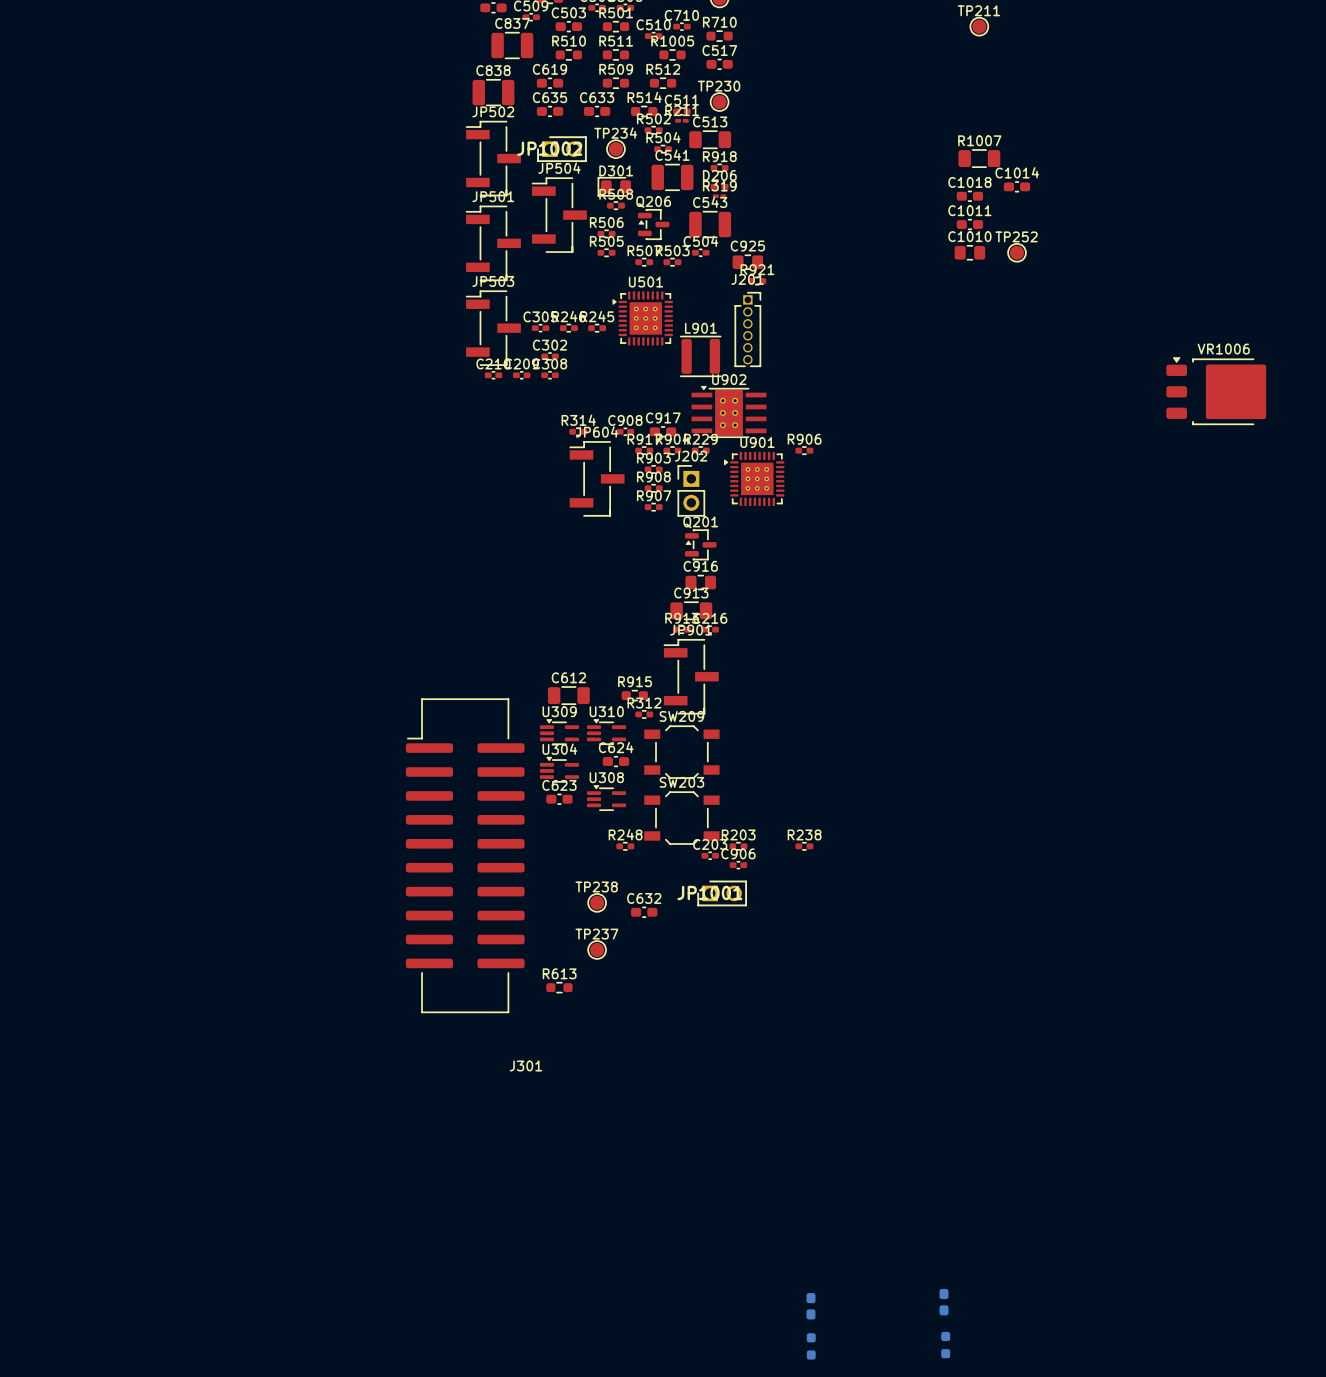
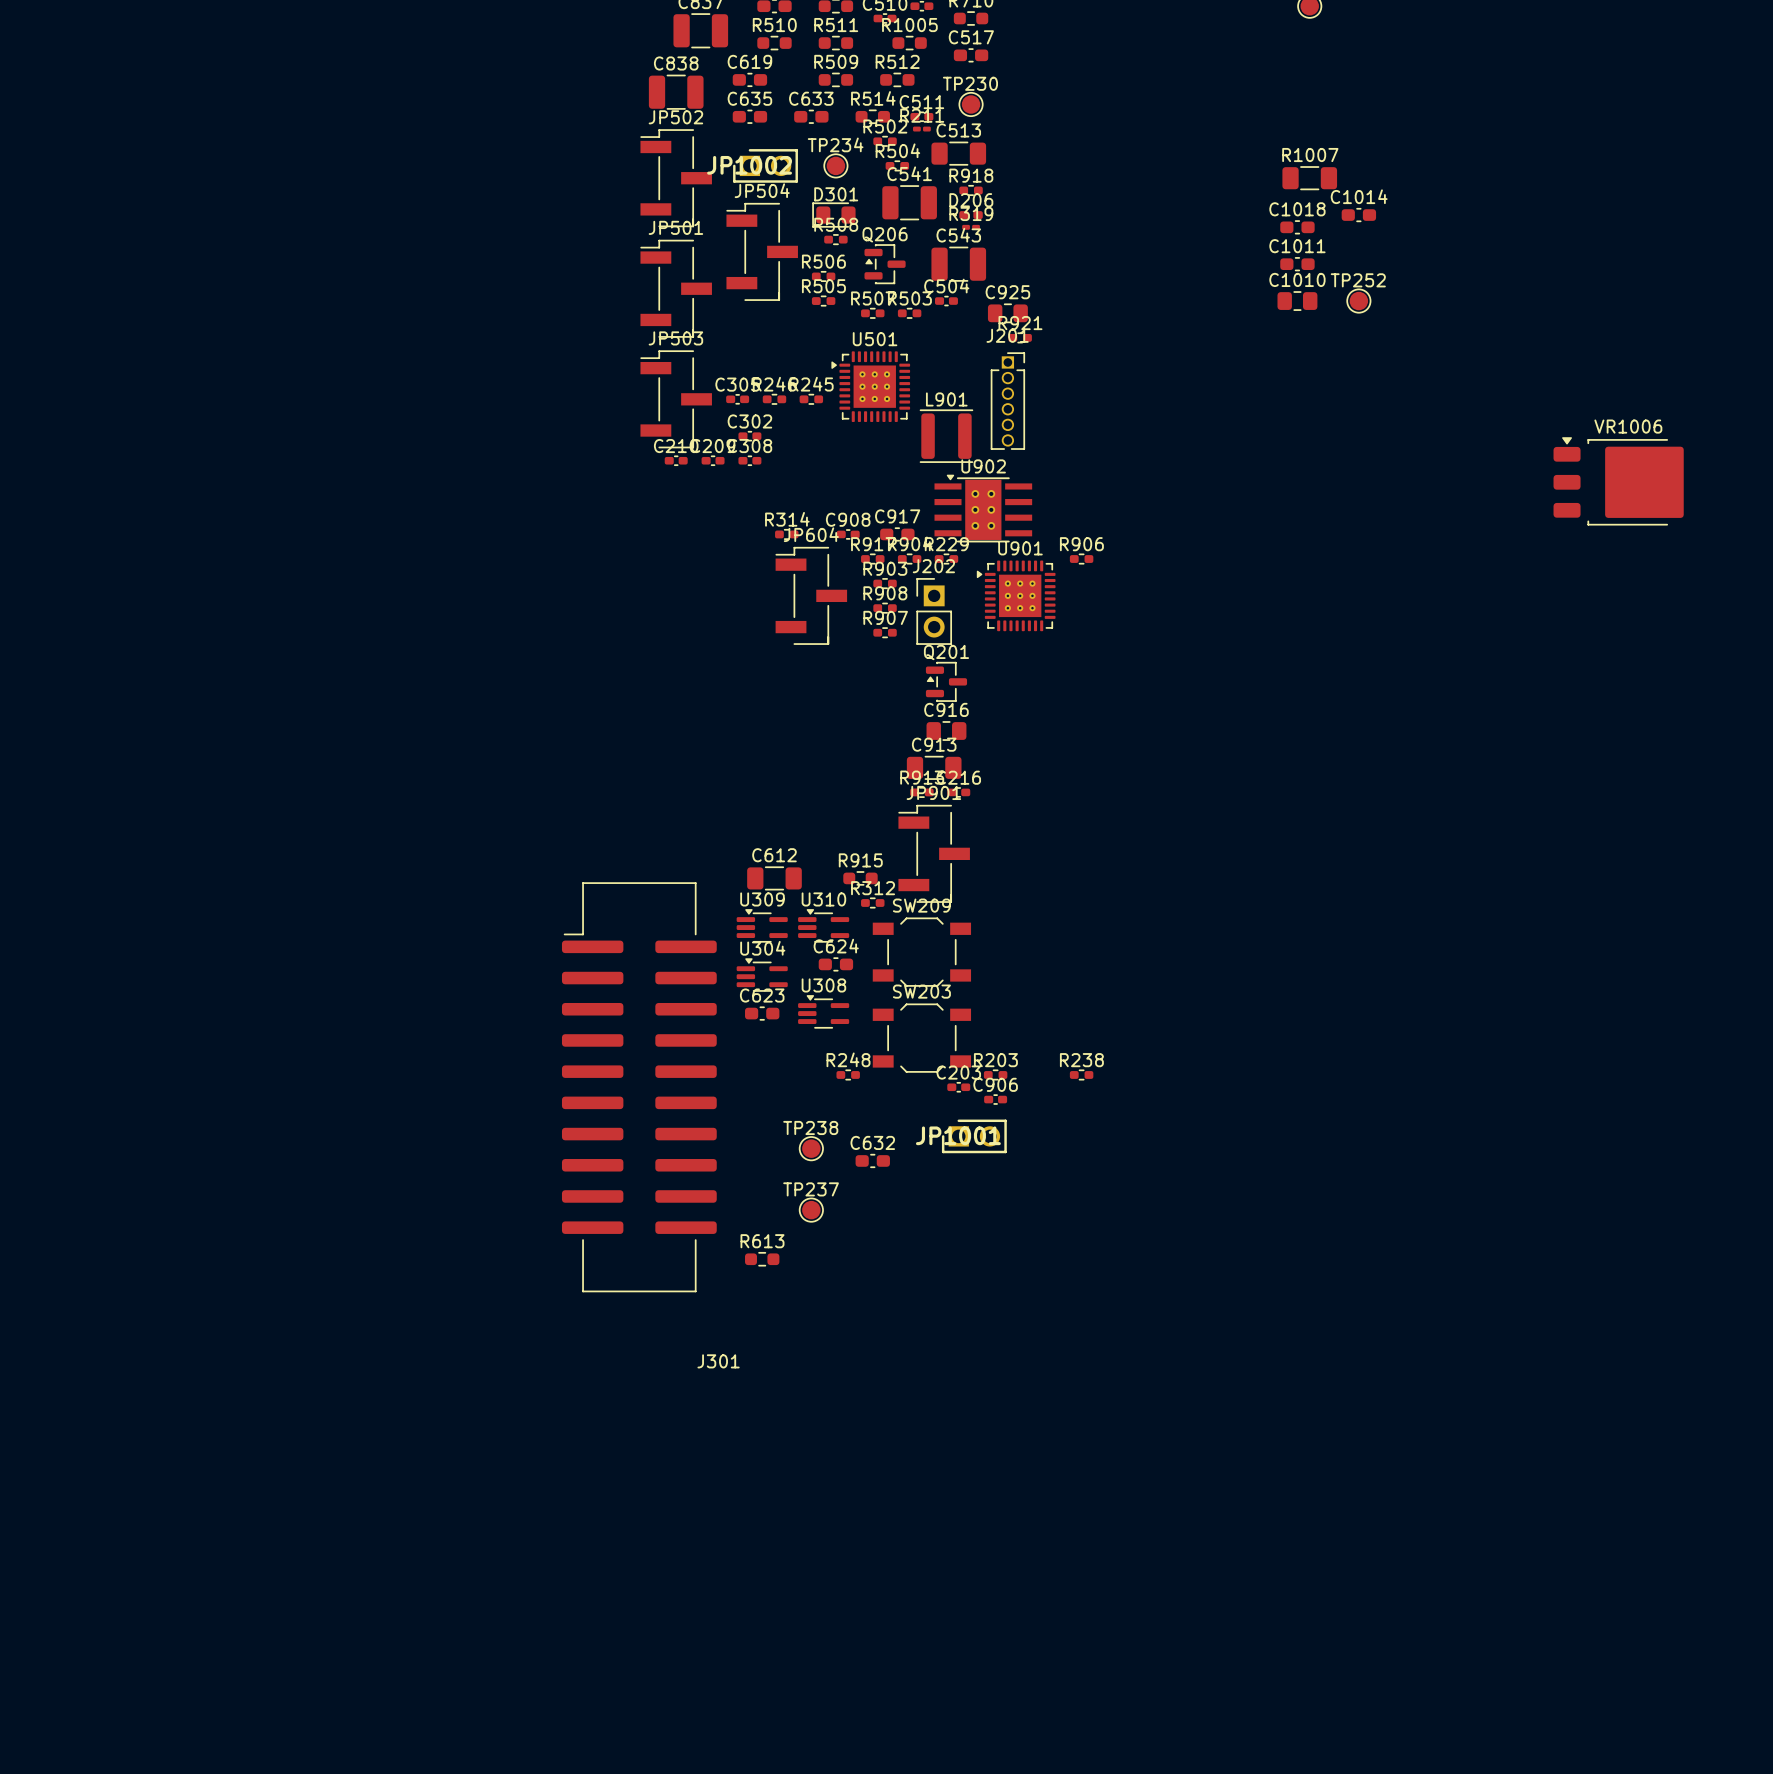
part: (944, 1302) -> none
part: (810, 1306) -> none
part: (945, 1345) -> none
part: (811, 1346) -> none

